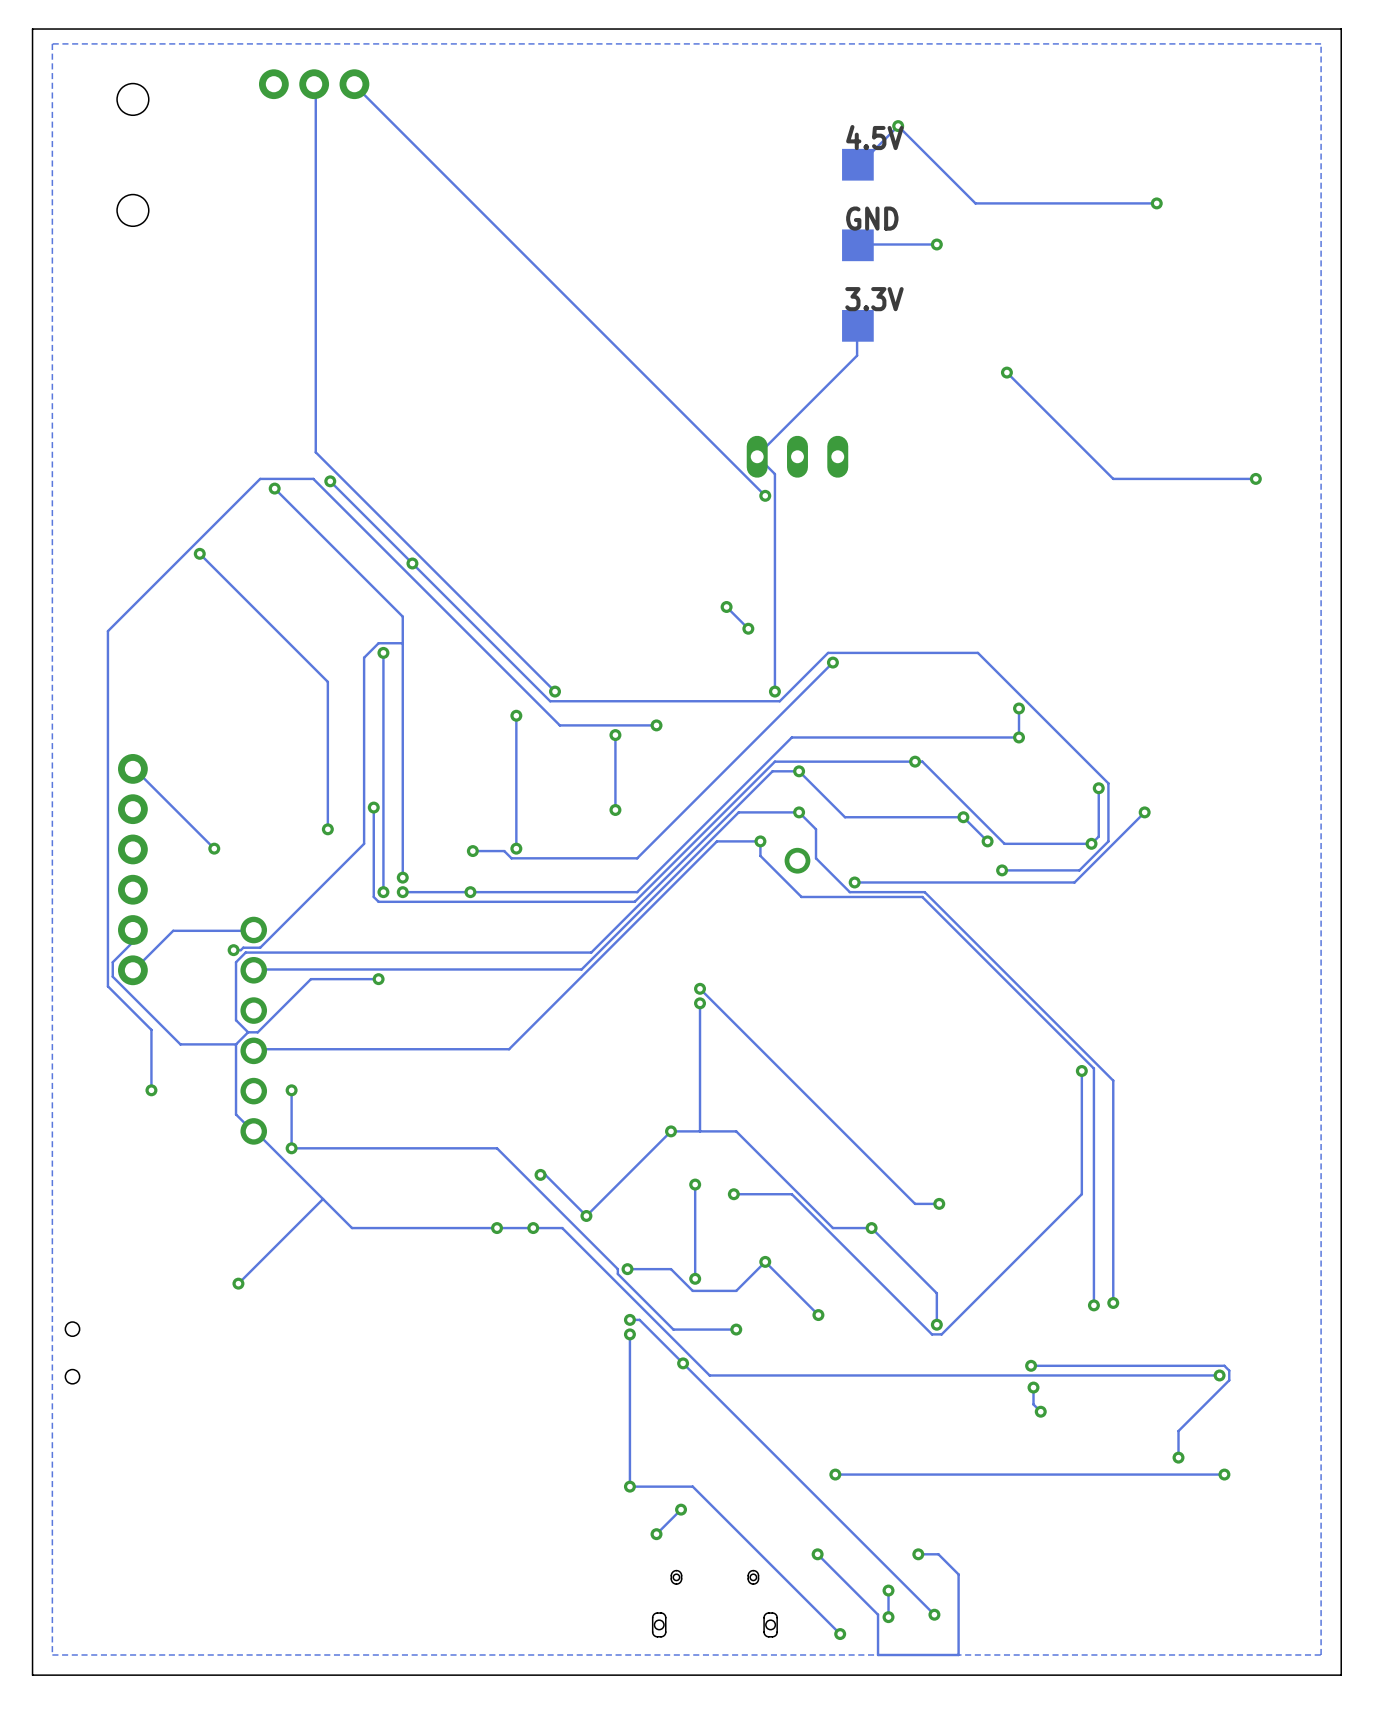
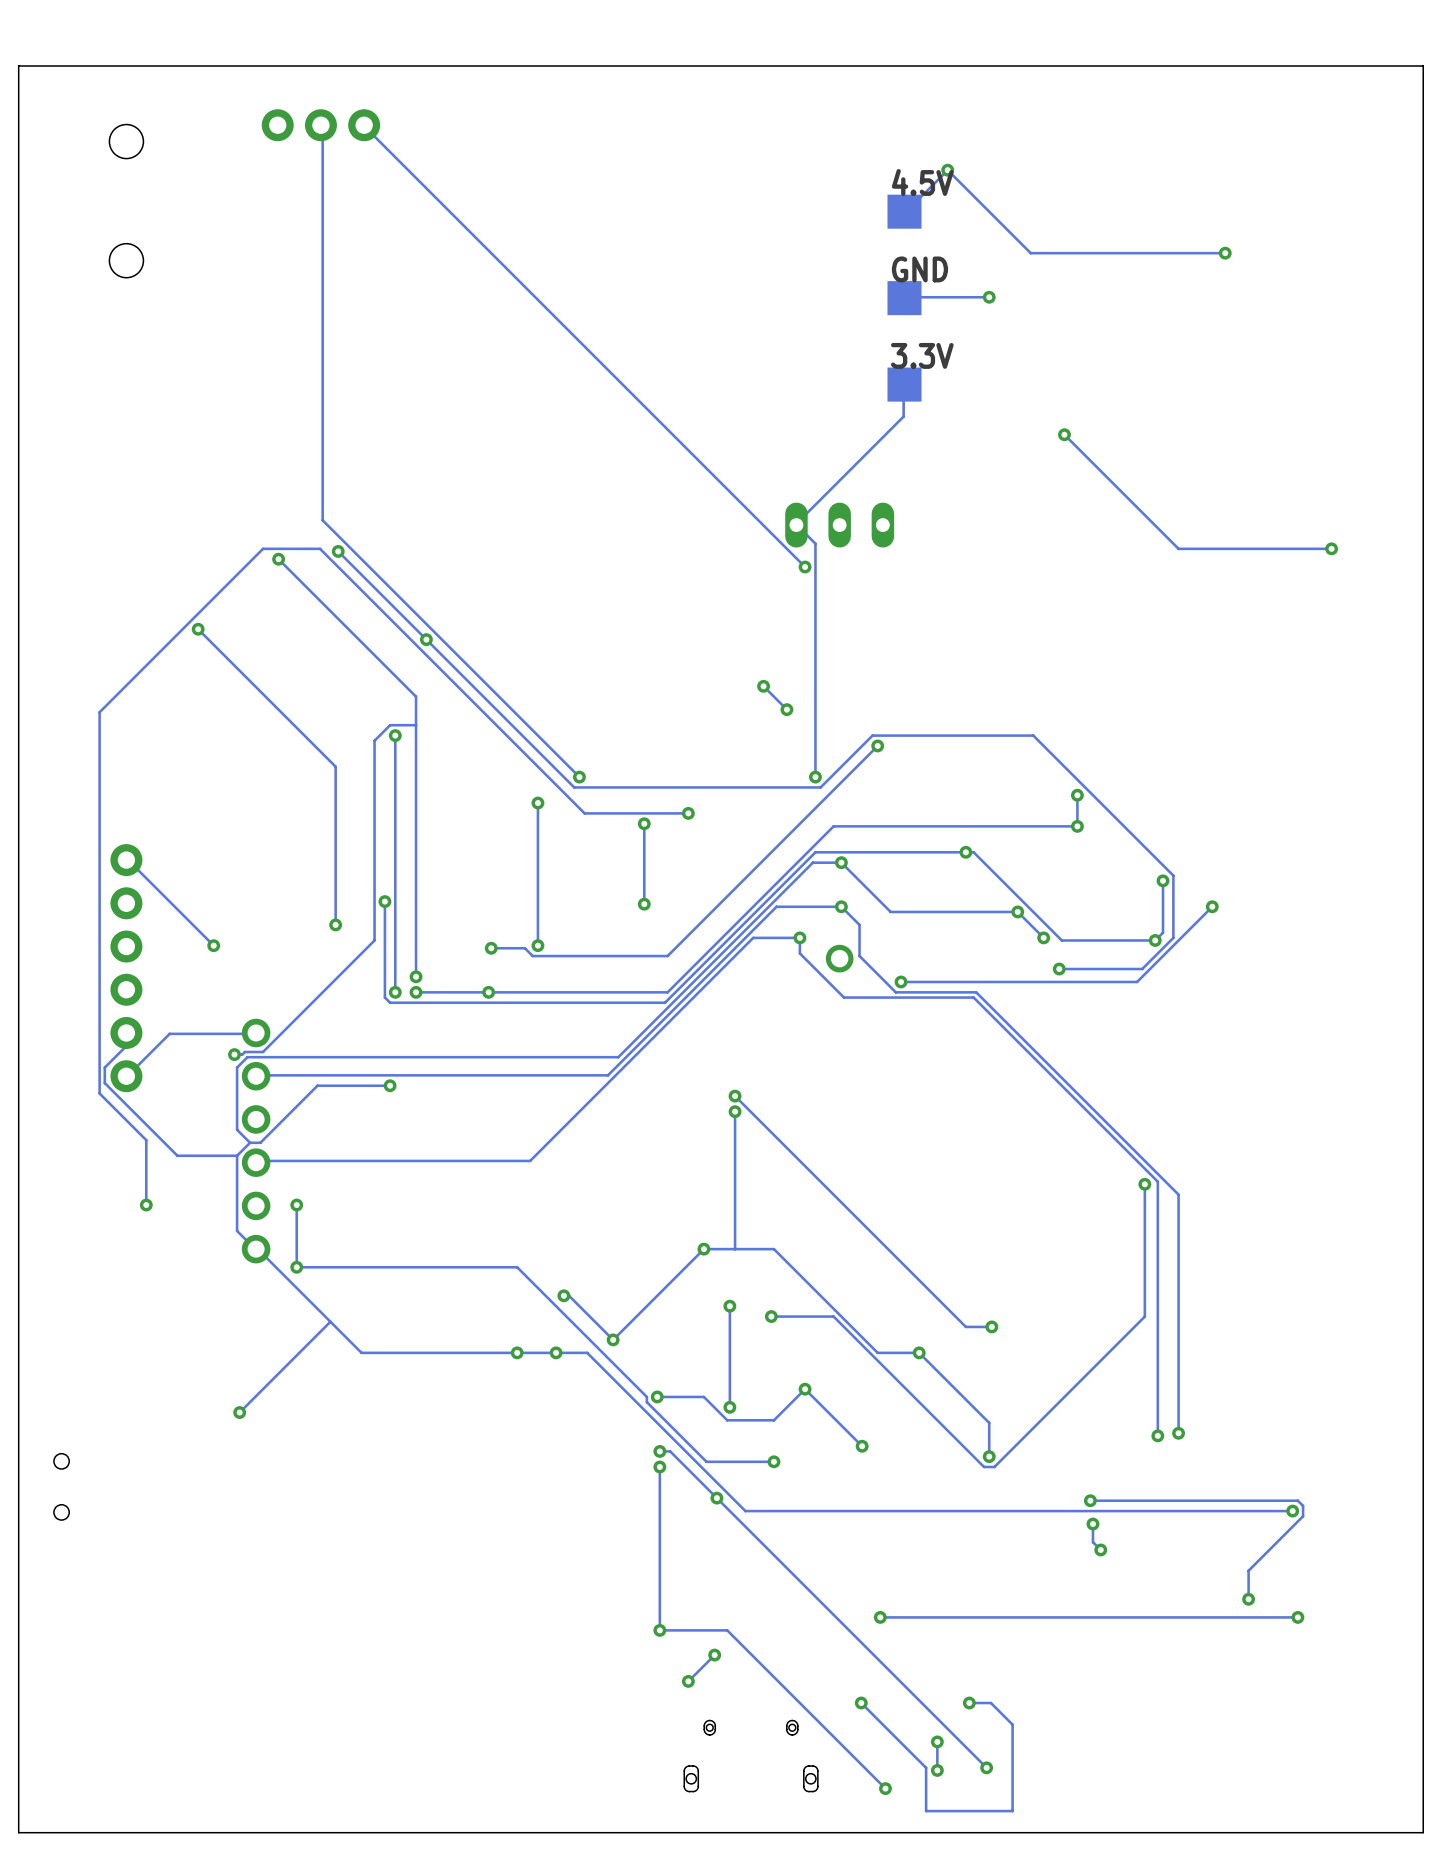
zone outline: (1321, 43) (52, 43) (52, 1654) (1321, 1654) (1321, 43) -> none

